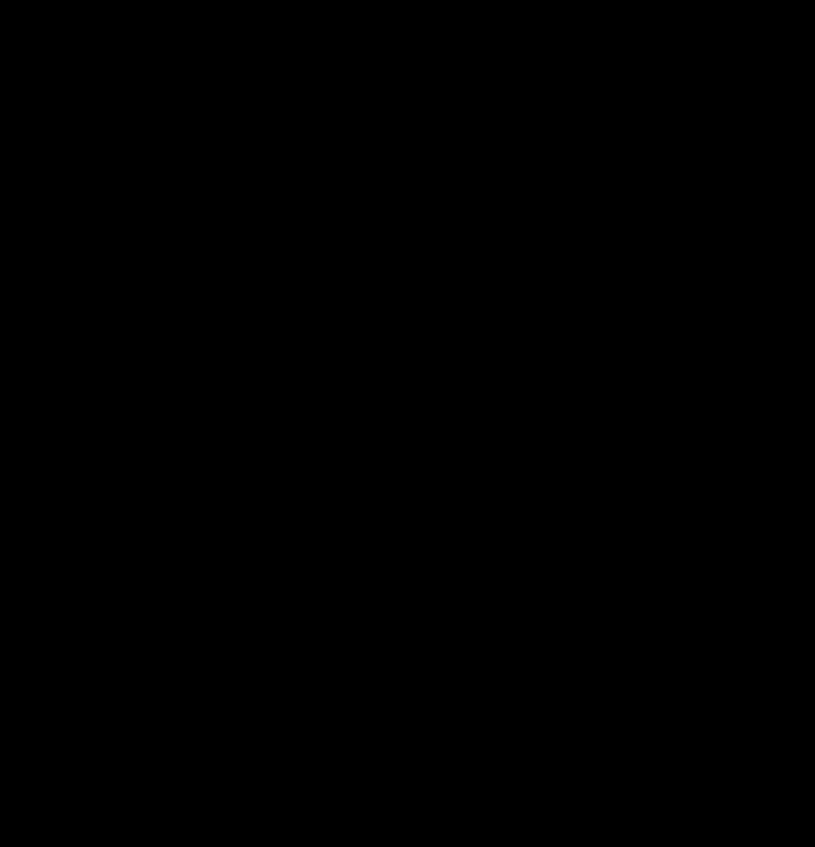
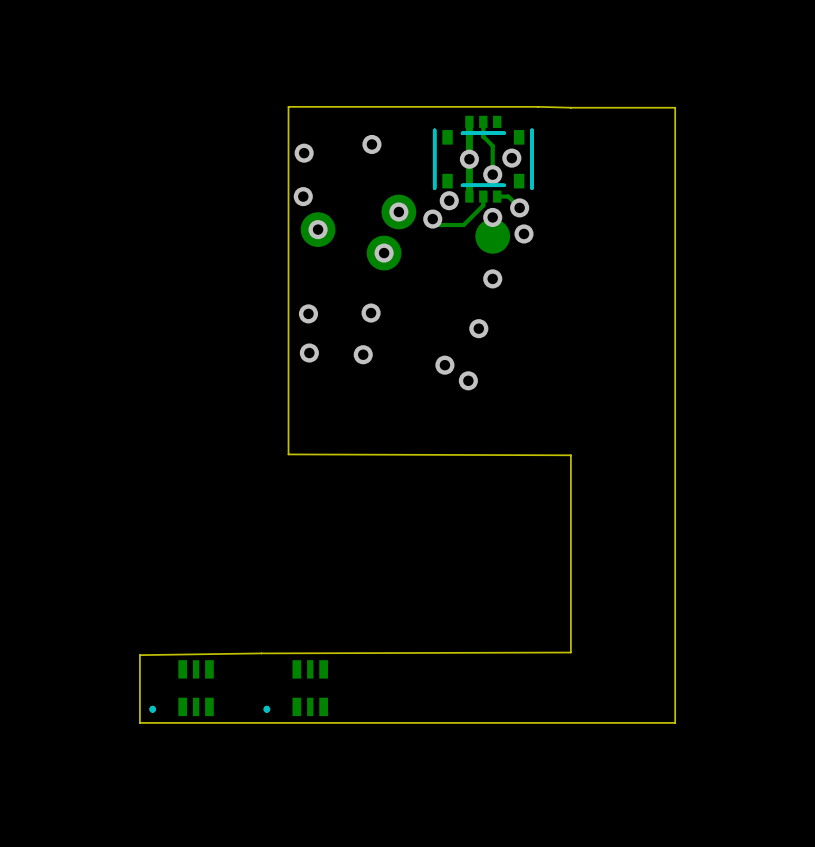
board edge: none -> (537, 106) (288, 106) (288, 454) (570, 455) (570, 652) (139, 655) (139, 722) (675, 722) (675, 107) (537, 106)
track: none -> (469, 121) (469, 196)
track: none -> (483, 121) (483, 136) (492, 145) (492, 174)
via: none -> (371, 144)
via: none -> (304, 153)
via: none -> (511, 158)
via: none -> (469, 159)
part: none -> (483, 159)
via: none -> (492, 174)
track: none -> (484, 195) (483, 205) (463, 225) (438, 225) (432, 219)
via: none -> (303, 196)
track: none -> (497, 196) (508, 196) (519, 207)
via: none -> (449, 200)
via: none -> (519, 207)
part: none -> (398, 211)
via: none -> (398, 211)
via: none -> (492, 217)
via: none -> (432, 219)
part: none -> (318, 229)
via: none -> (318, 229)
via: none -> (523, 233)
part: none -> (492, 236)
part: none -> (384, 253)
via: none -> (384, 253)
via: none -> (492, 278)
via: none -> (308, 313)
via: none -> (371, 313)
via: none -> (478, 328)
via: none -> (309, 353)
via: none -> (363, 354)
via: none -> (444, 365)
via: none -> (468, 380)
part: none -> (181, 688)
part: none -> (295, 688)

